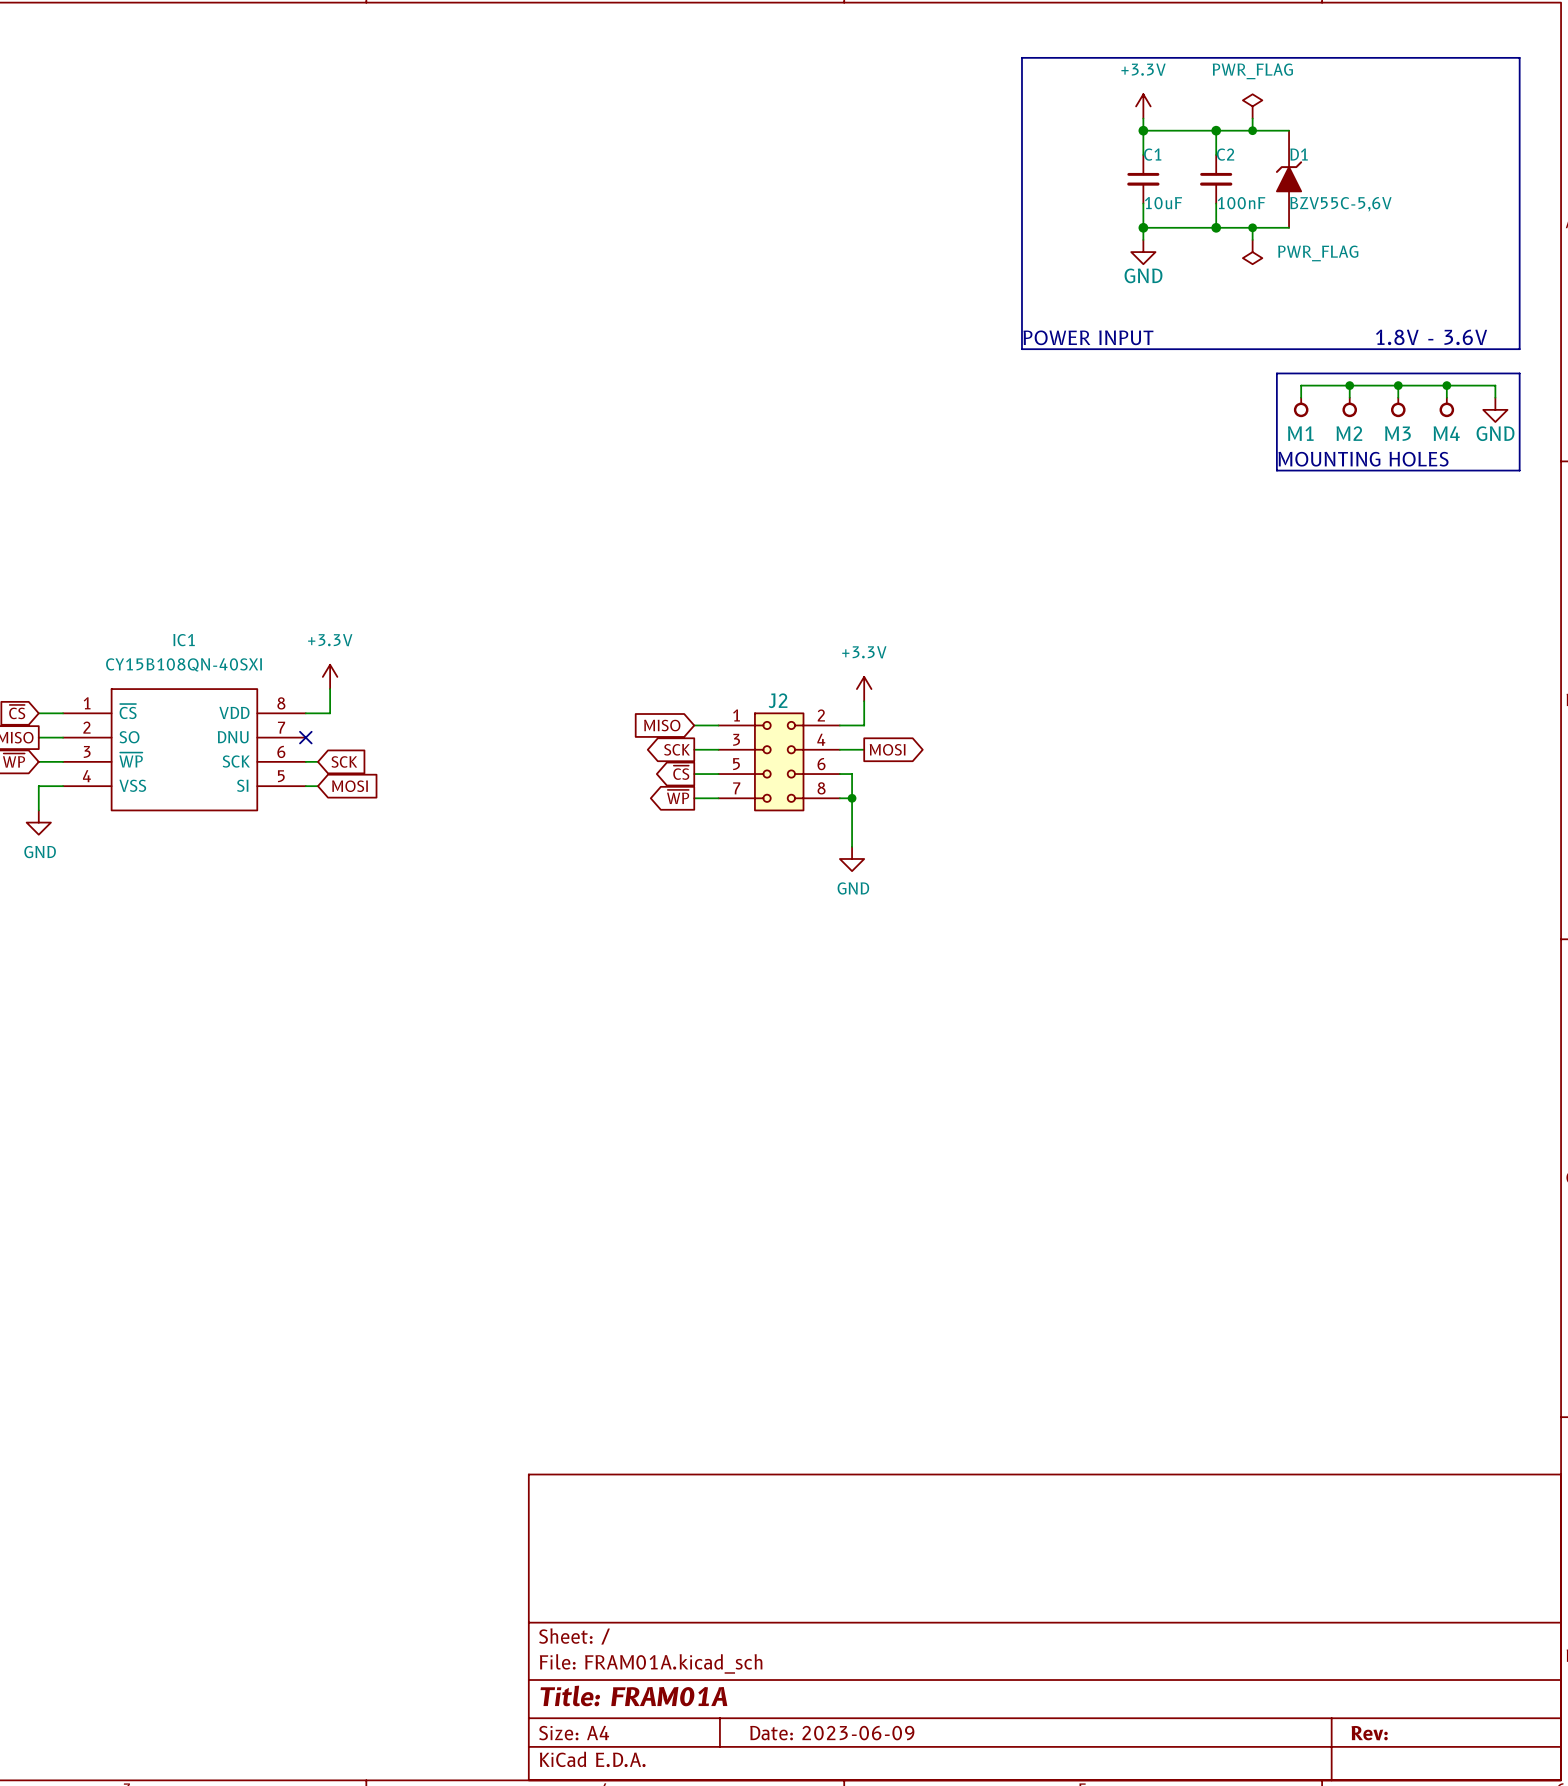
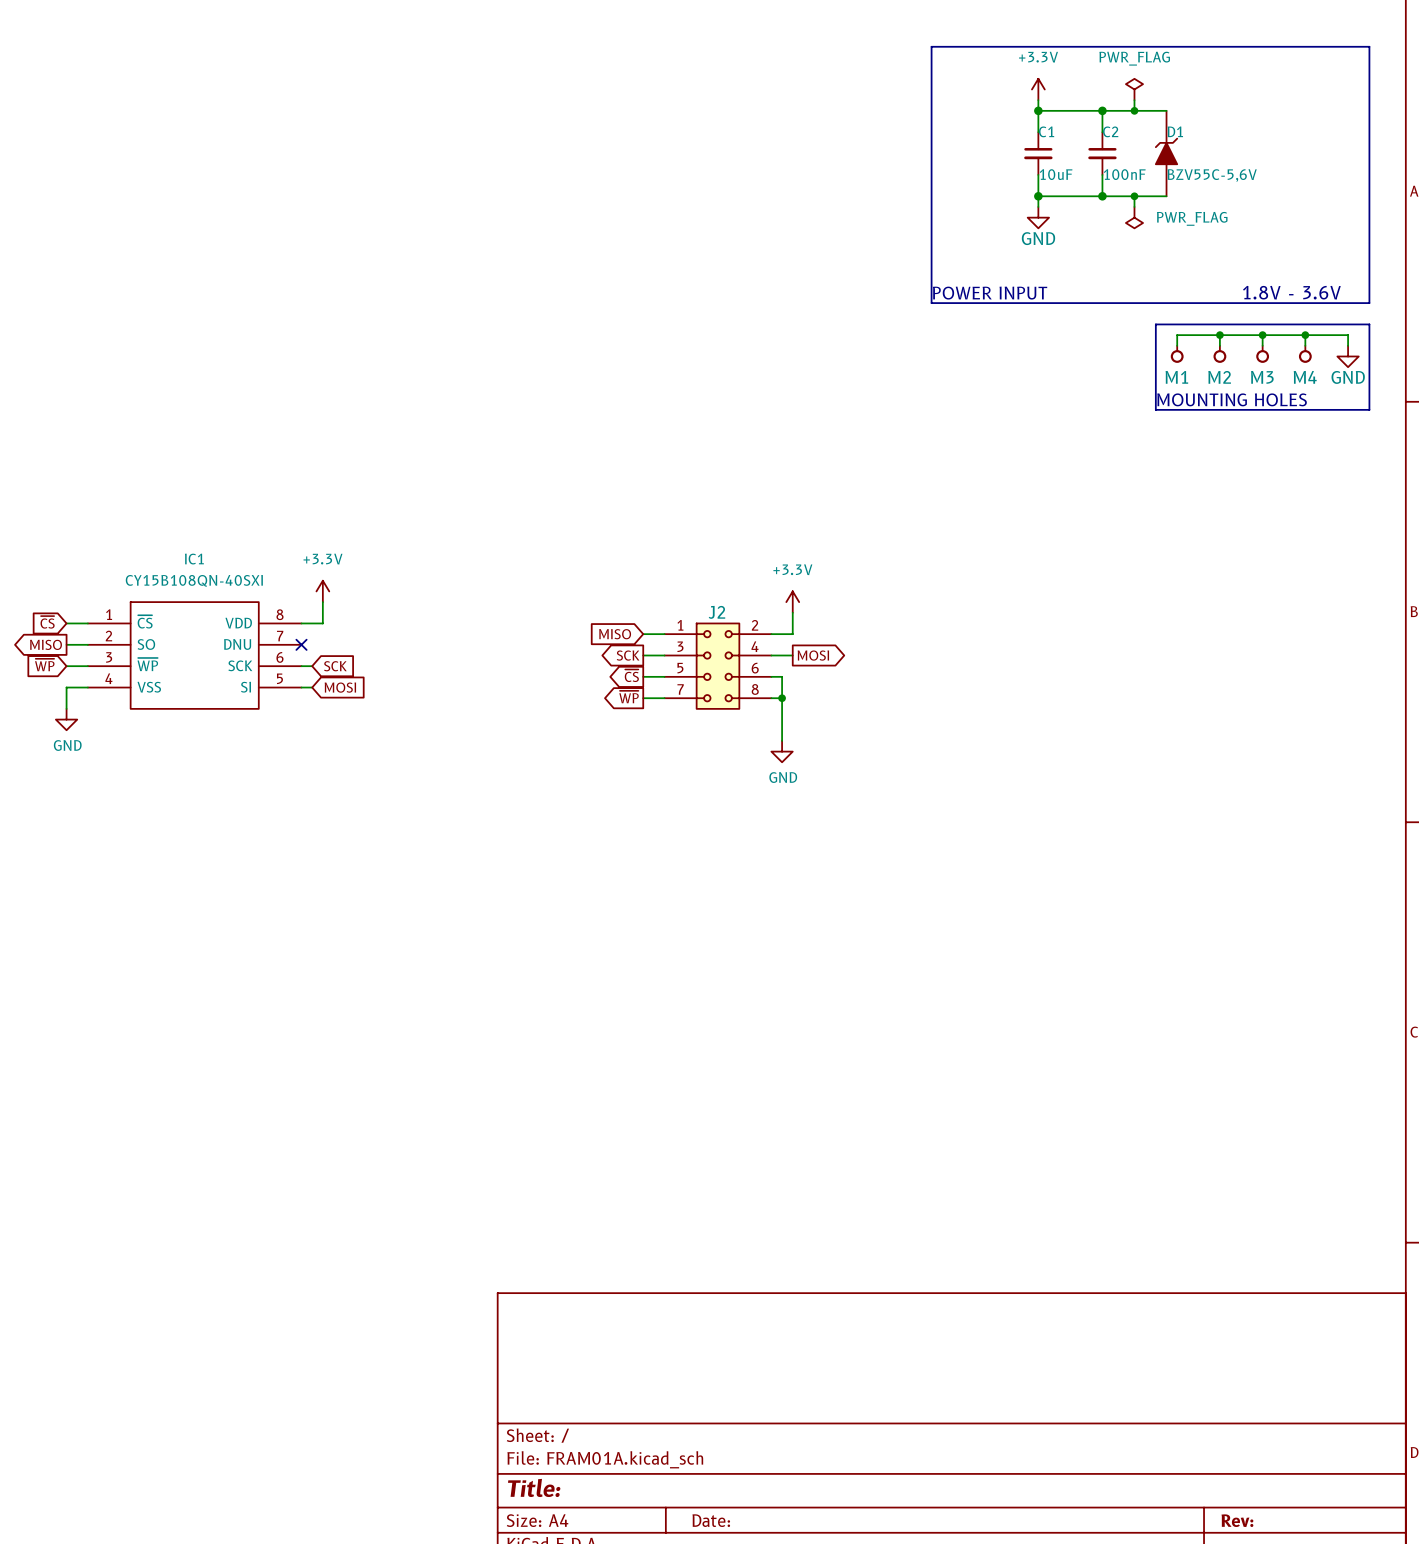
title block: Title: FRAM01A (633, 1695) -> Title: (534, 1487)
title block: Date: 2023-06-09 (832, 1733) -> Date: (711, 1520)

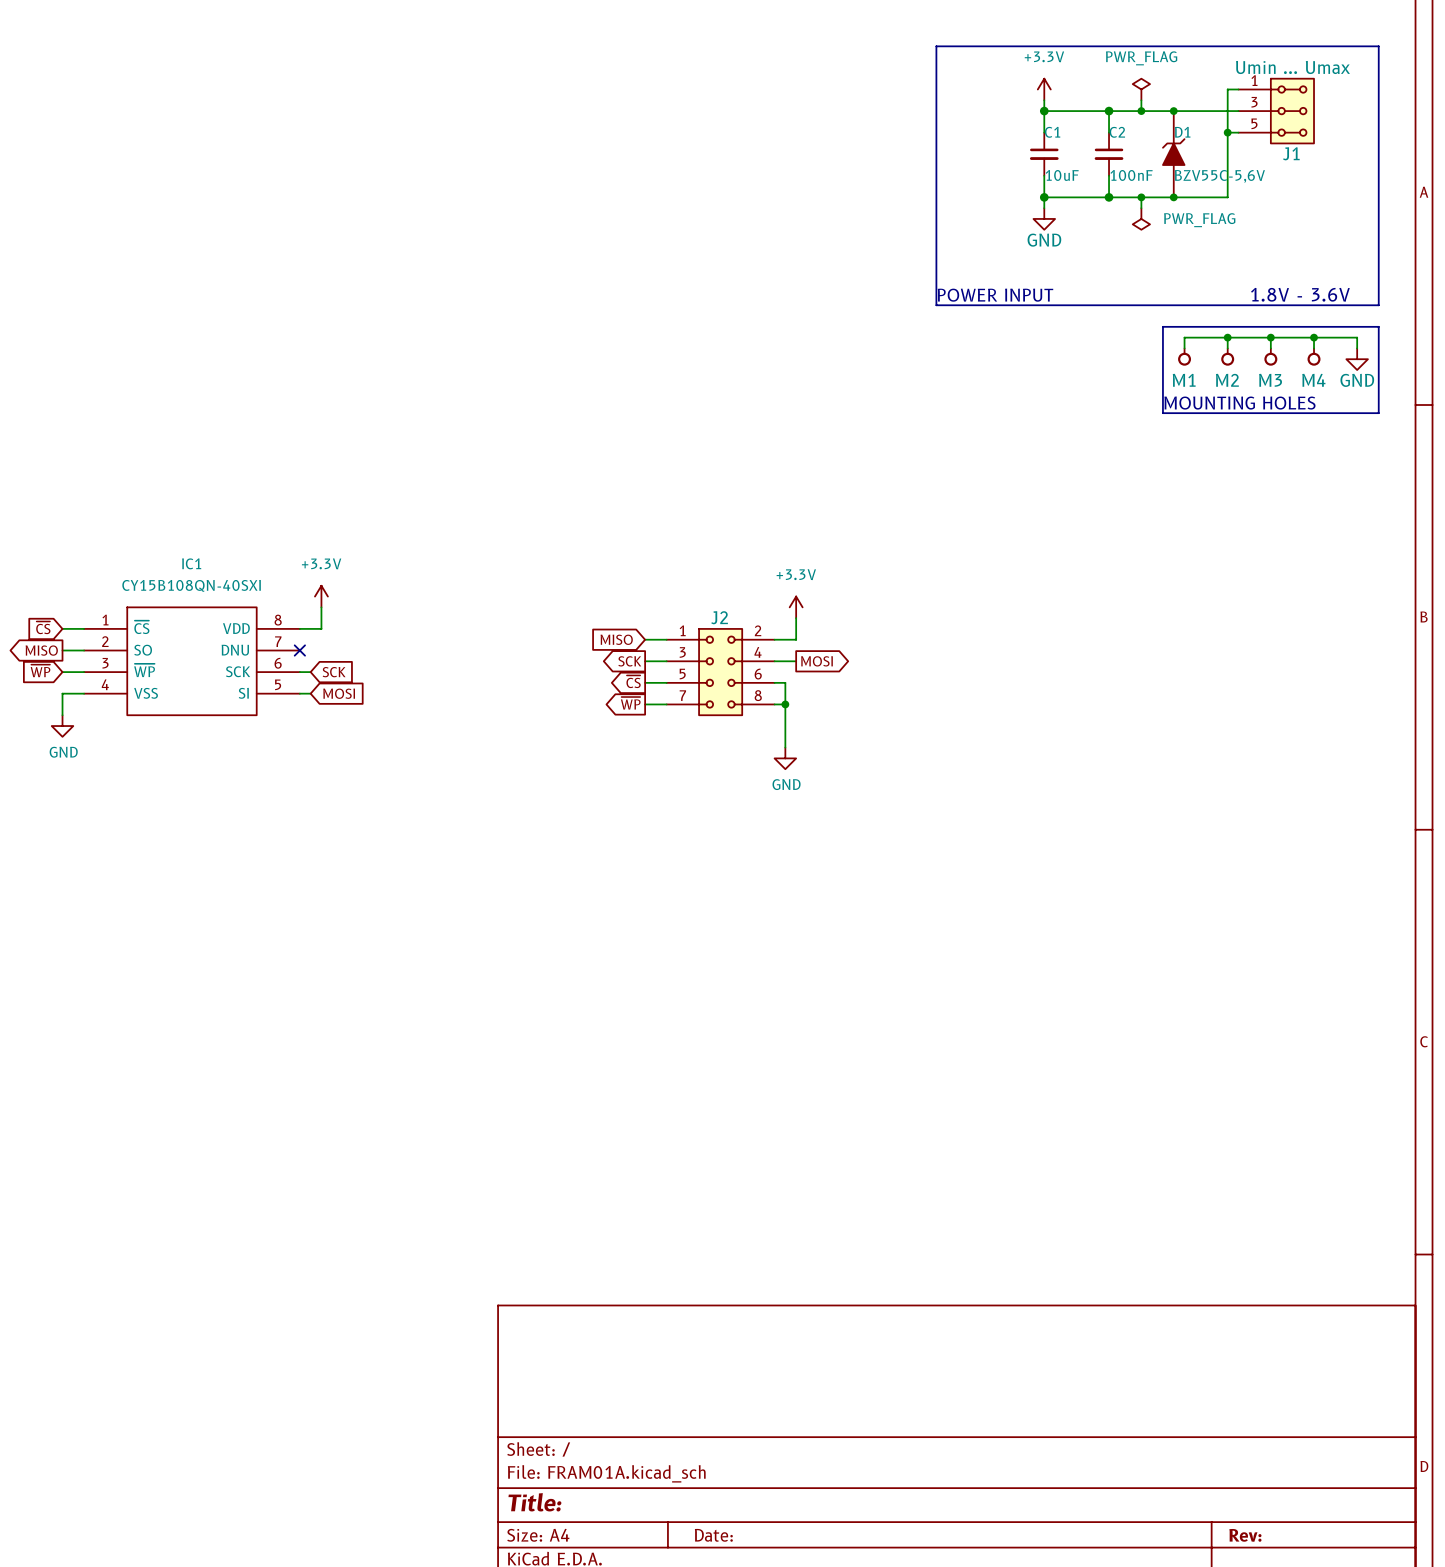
wire: none -> (1238, 89) (1227, 89) (1227, 197) (1173, 197)
wire: none -> (1173, 111) (1238, 111)
junction: none -> (1173, 111)
J1: none -> Umin ... Umax (1276, 111)
wire: none -> (1227, 132) (1238, 132)
junction: none -> (1227, 132)
junction: none -> (1173, 197)

